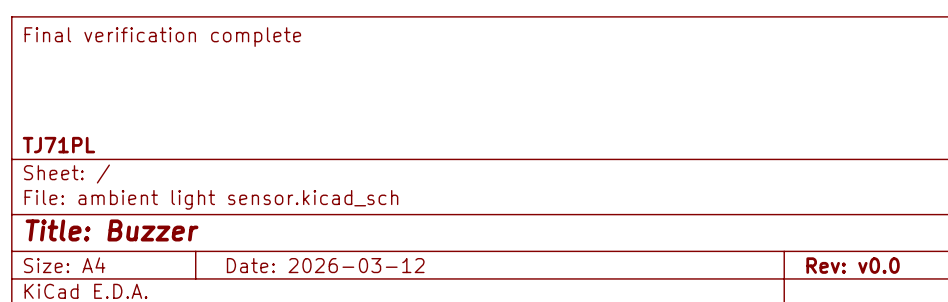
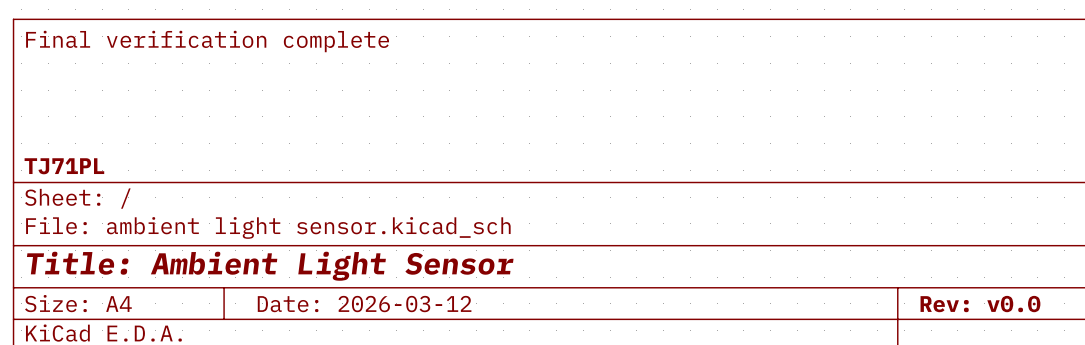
title block: Title: Buzzer (112, 230) -> Title: Ambient Light Sensor (270, 266)

